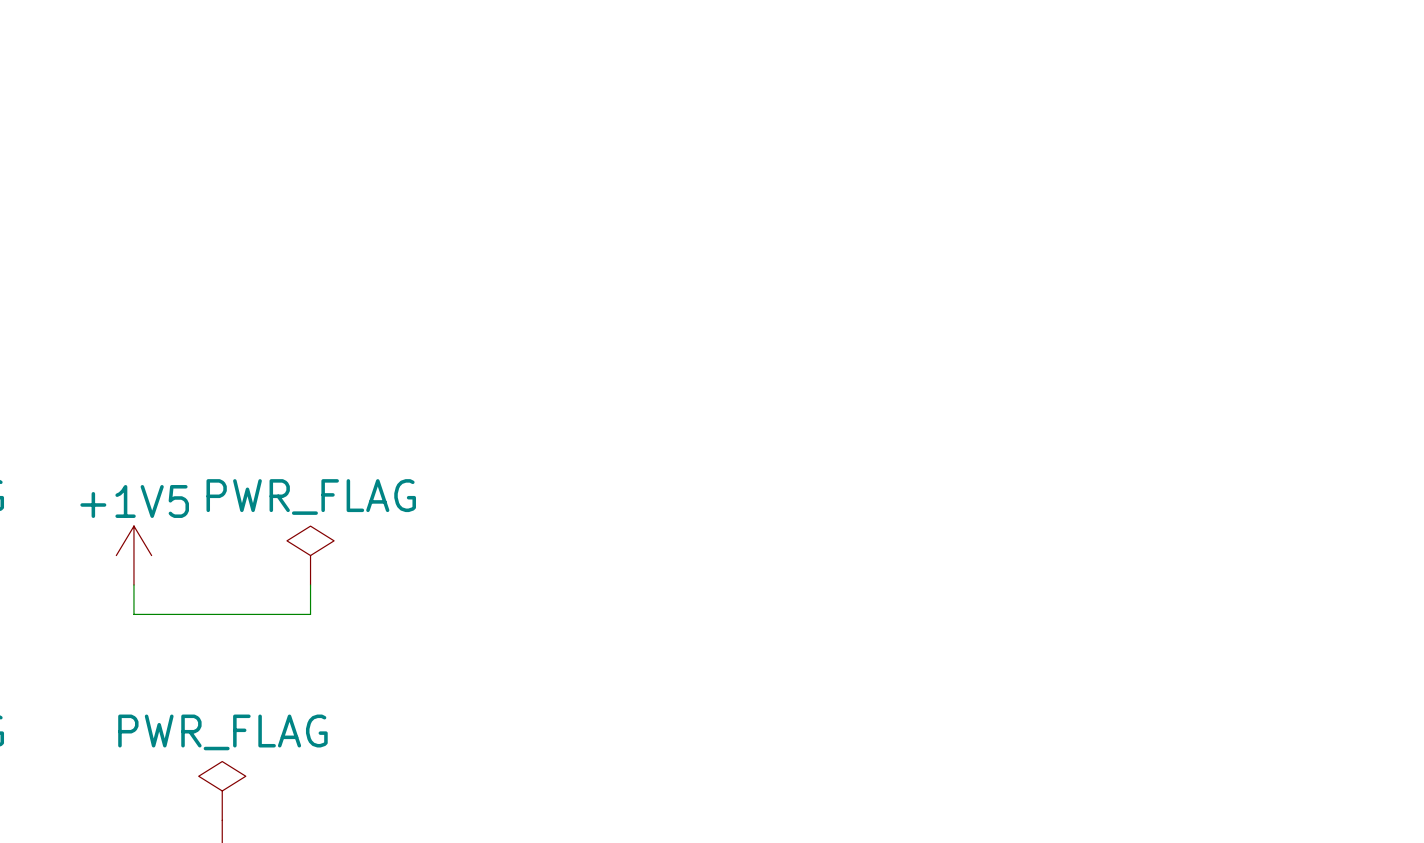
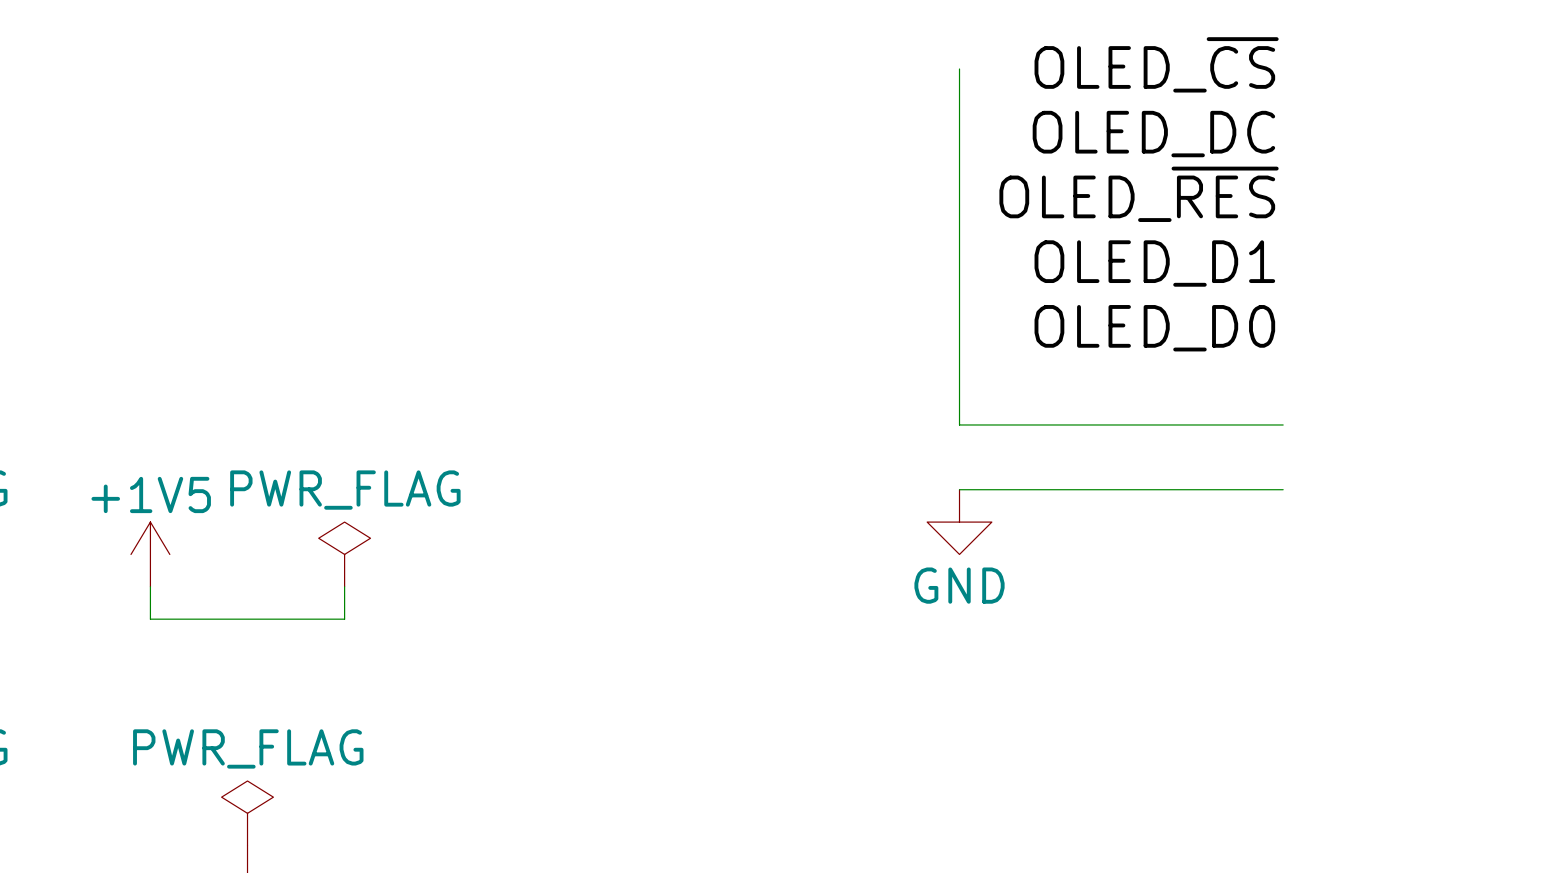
label: none -> OLED_~{CS} (1156, 64)
wire: none -> (959, 68) (959, 424) (1283, 424)
label: none -> OLED_DC (1153, 134)
label: none -> OLED_~{RES} (1139, 194)
label: none -> OLED_D1 (1154, 263)
label: none -> OLED_D0 (1154, 328)
wire: none -> (959, 489) (1283, 489)
power symbol: none -> GND (959, 522)

